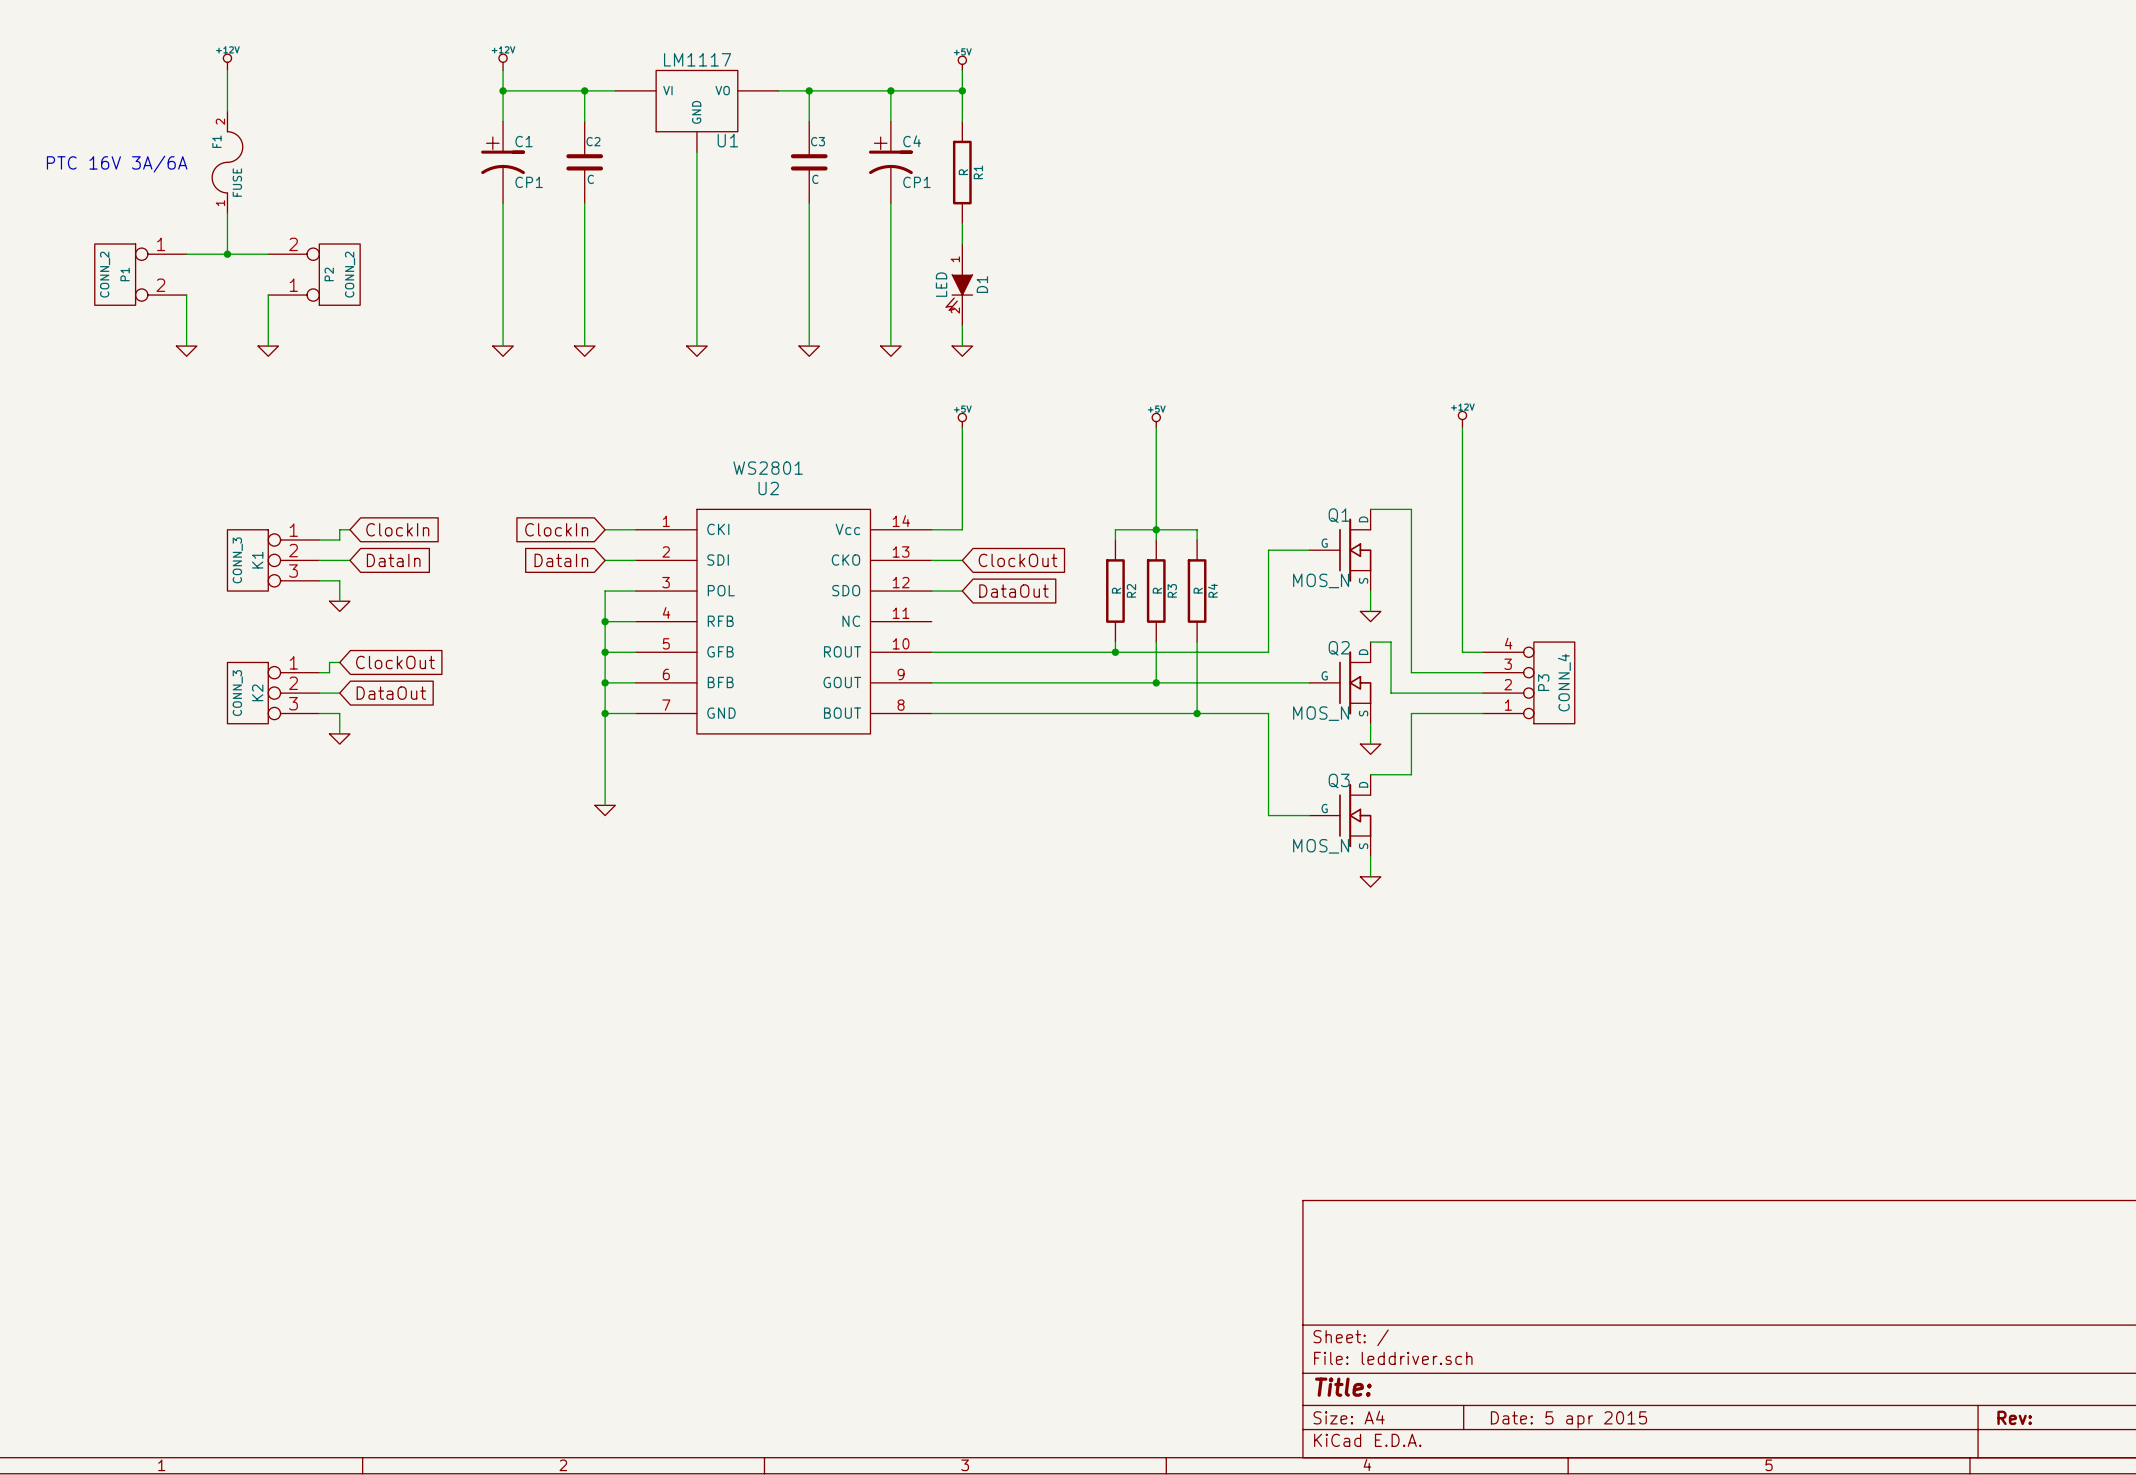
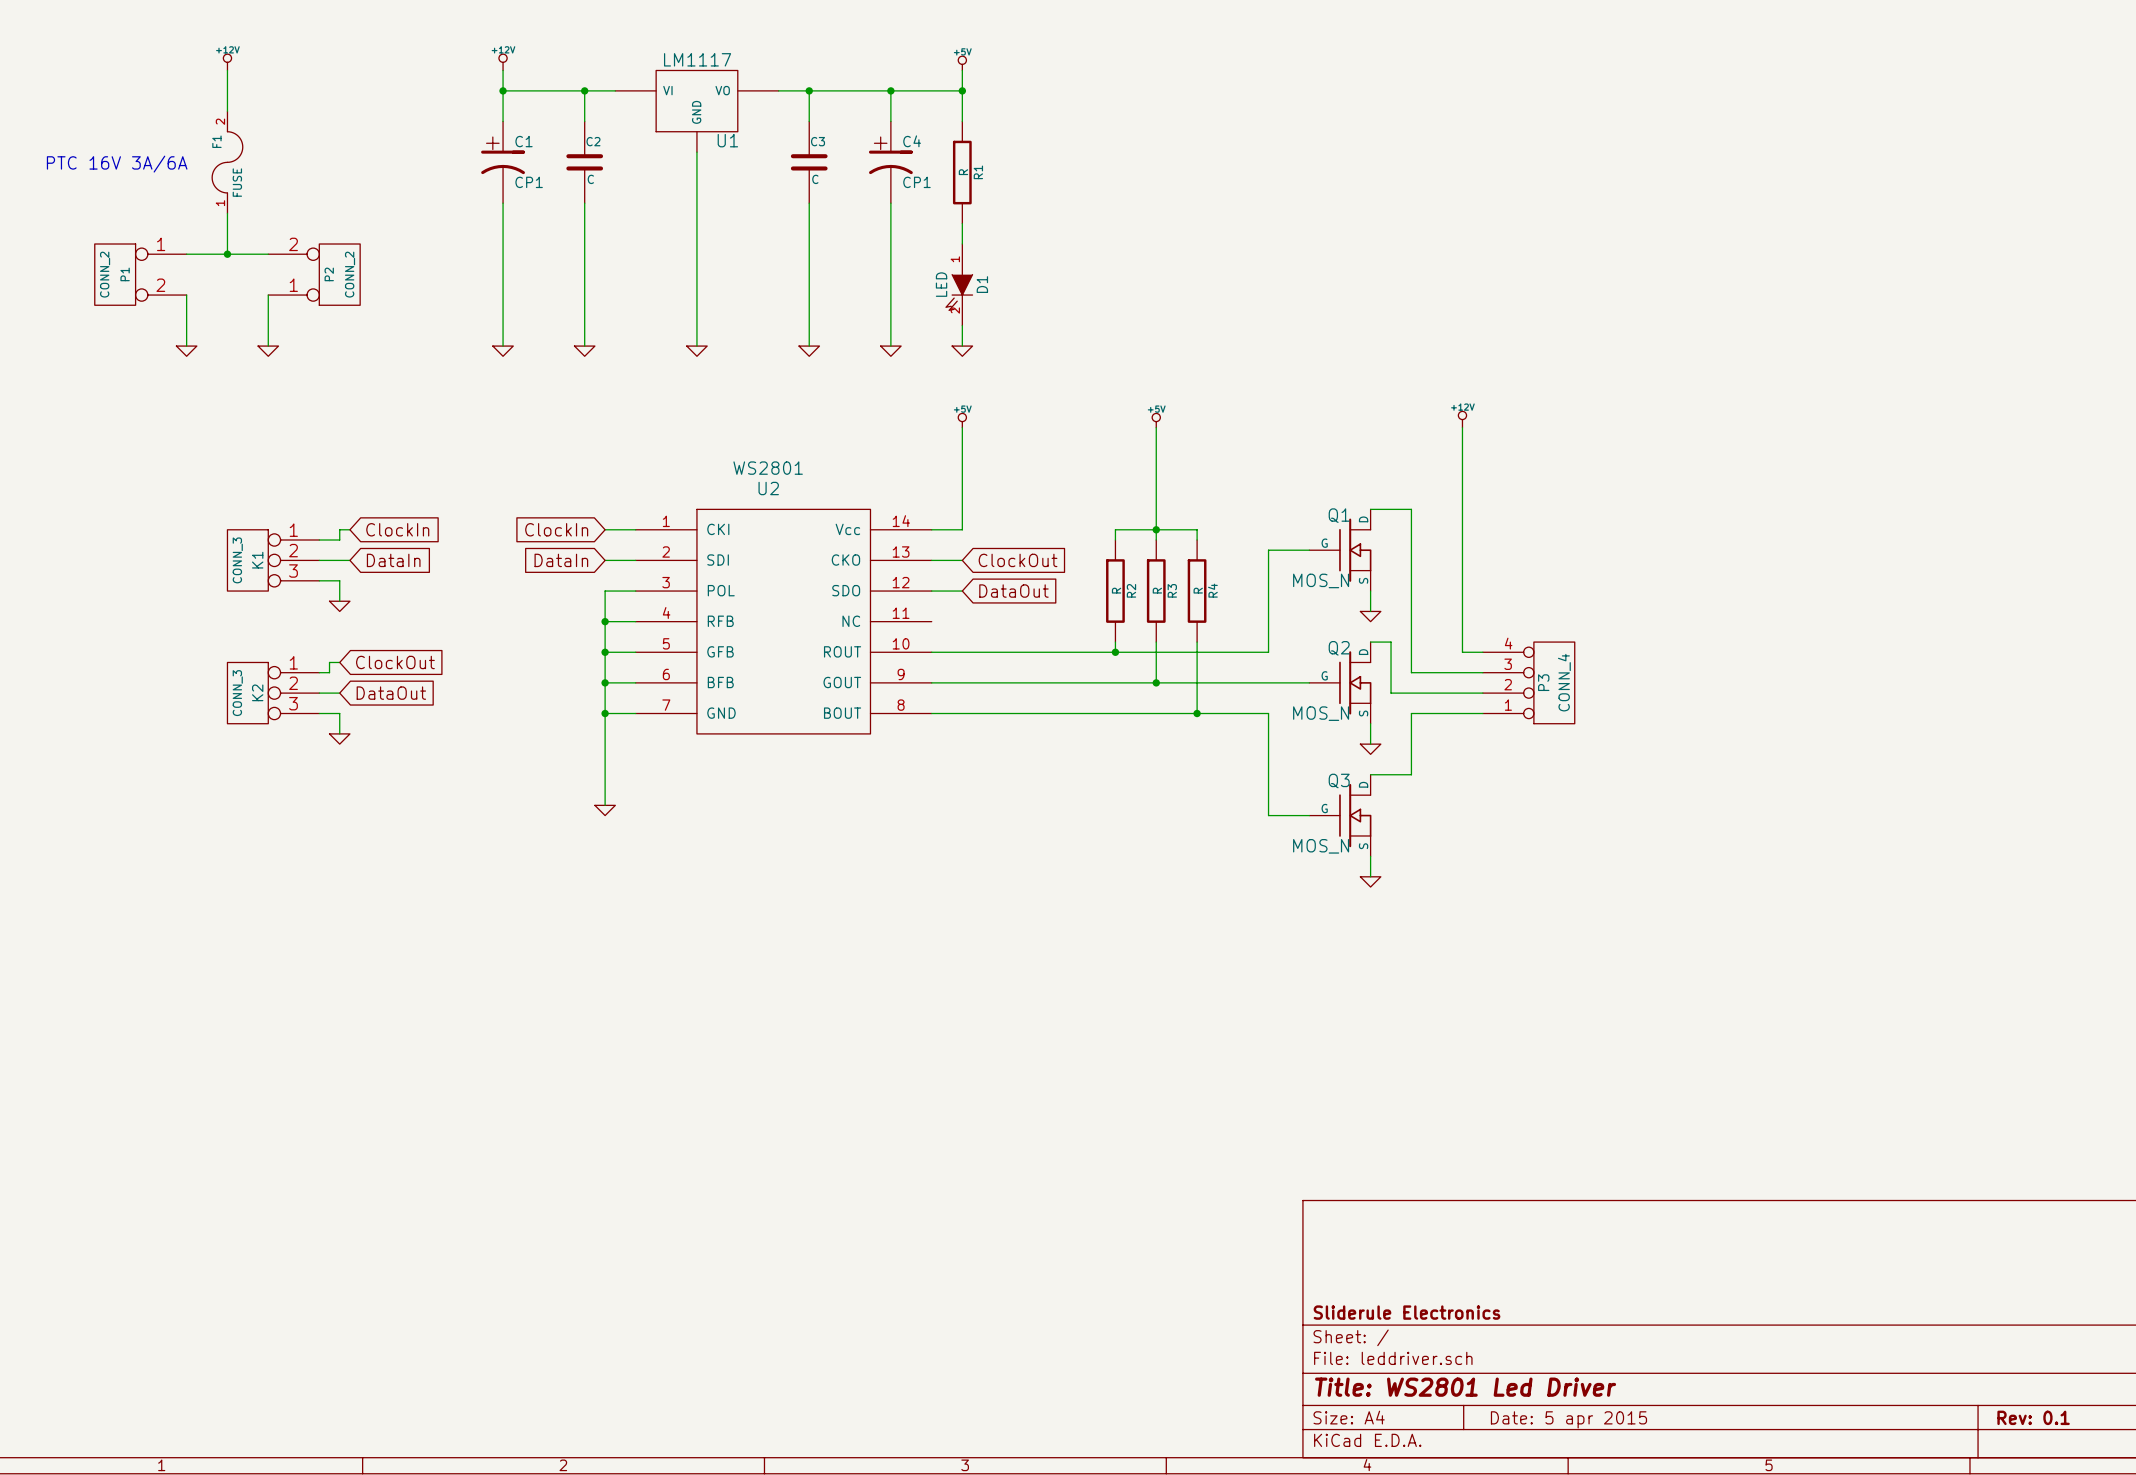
title block: none -> Sliderule Electronics (1407, 1312)
title block: Title: (1343, 1387) -> Title: WS2801 Led Driver (1465, 1387)
title block: Rev: (2014, 1417) -> Rev: 0.1 (2033, 1417)

